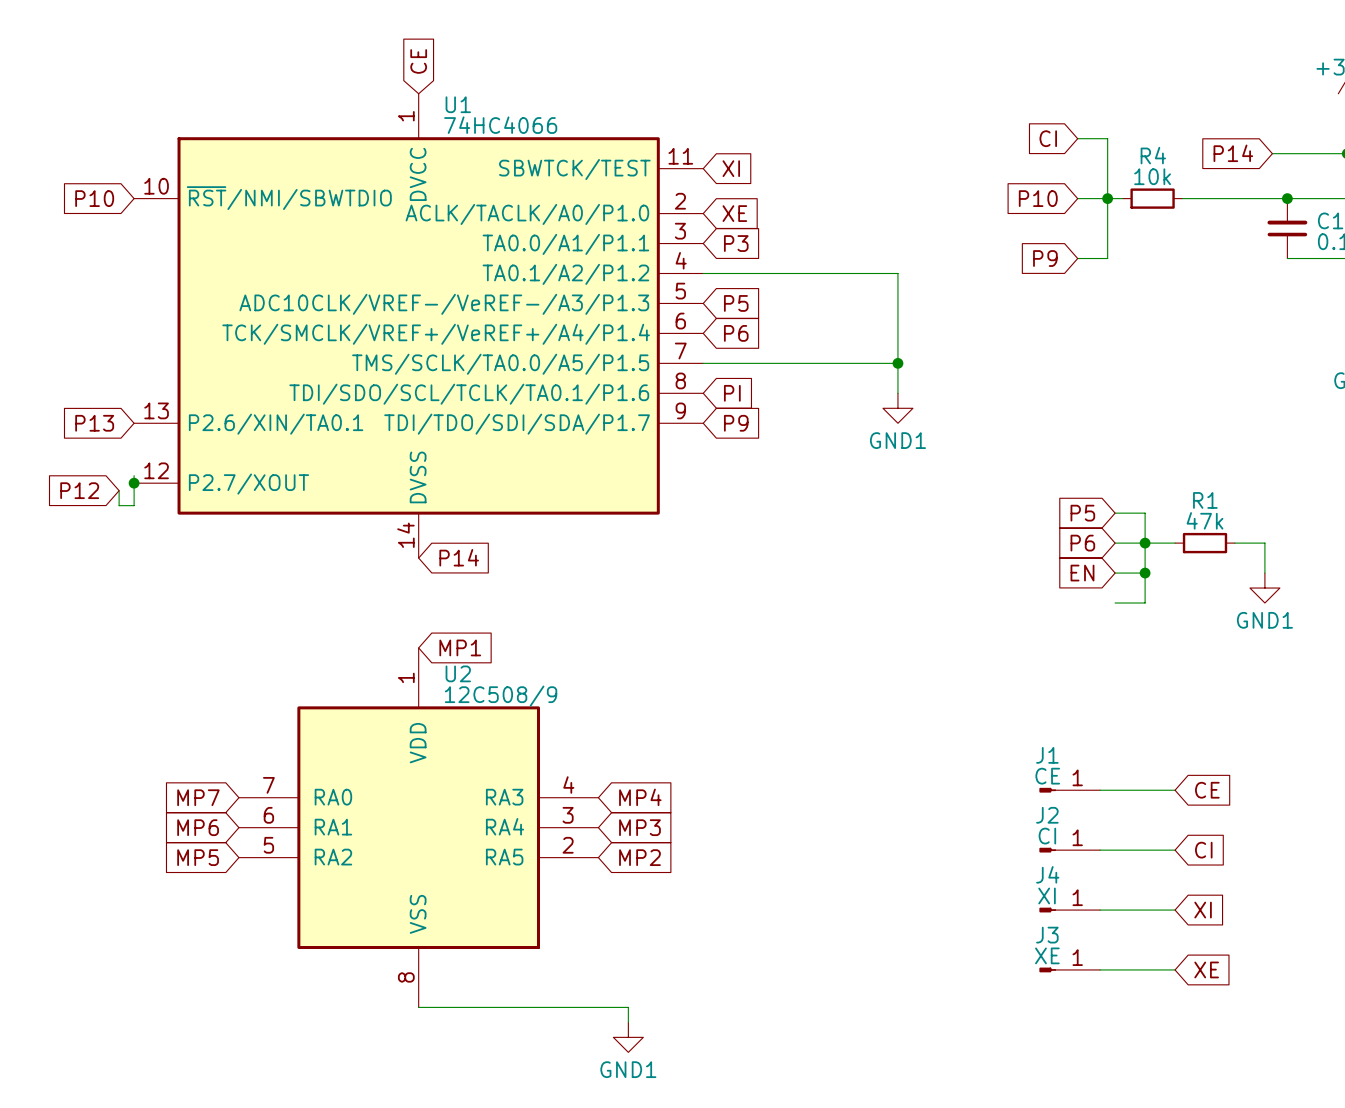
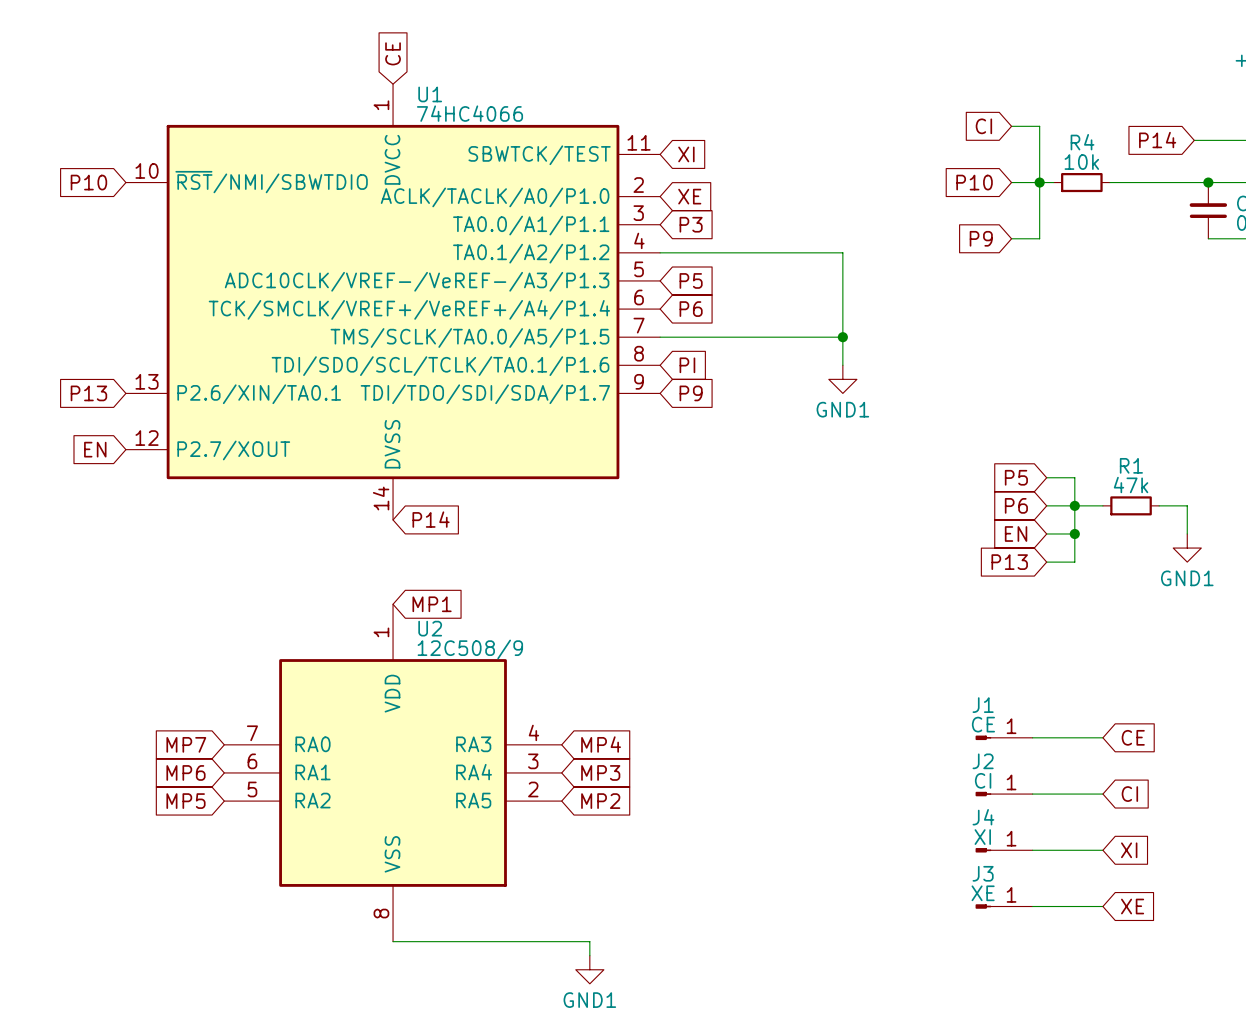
wire: (134, 475) (134, 505) (119, 505) (119, 490) -> none
global label: none -> EN (95, 449)
junction: (134, 483) -> none
global label: P12 (79, 490) -> none
global label: none -> P13 (1009, 562)

